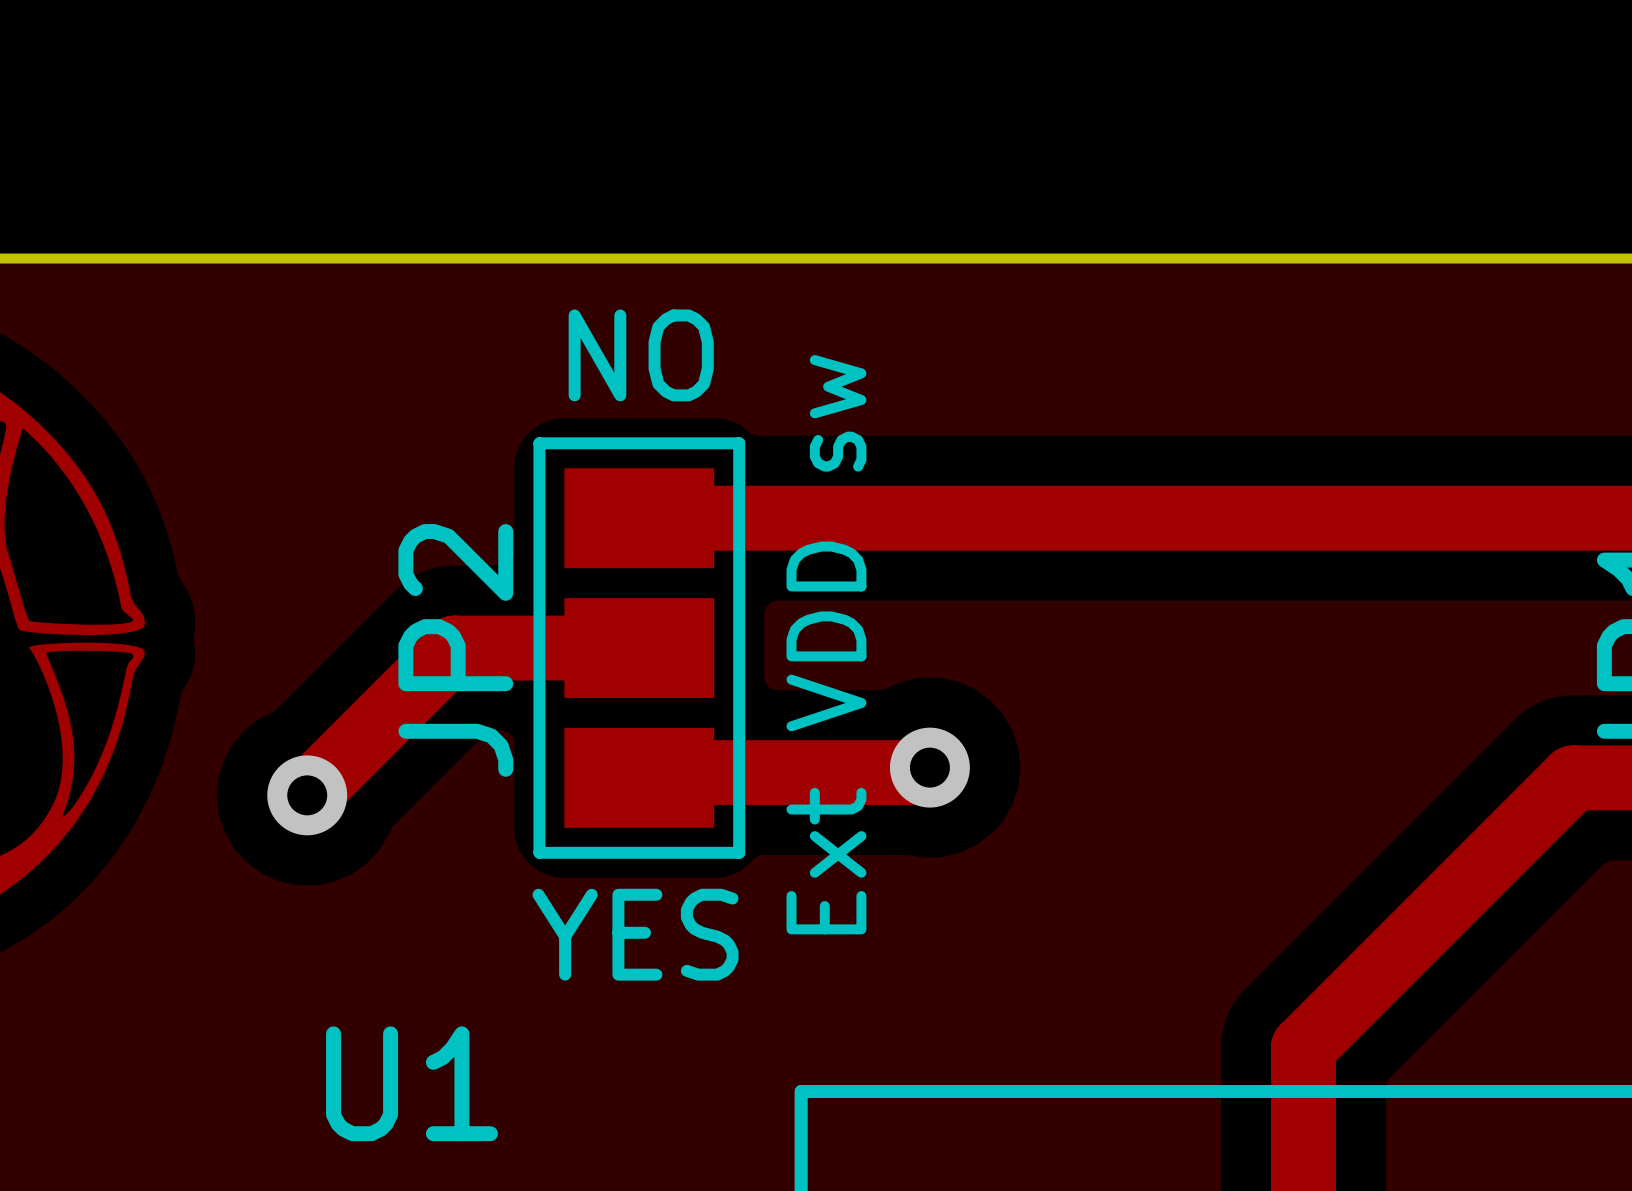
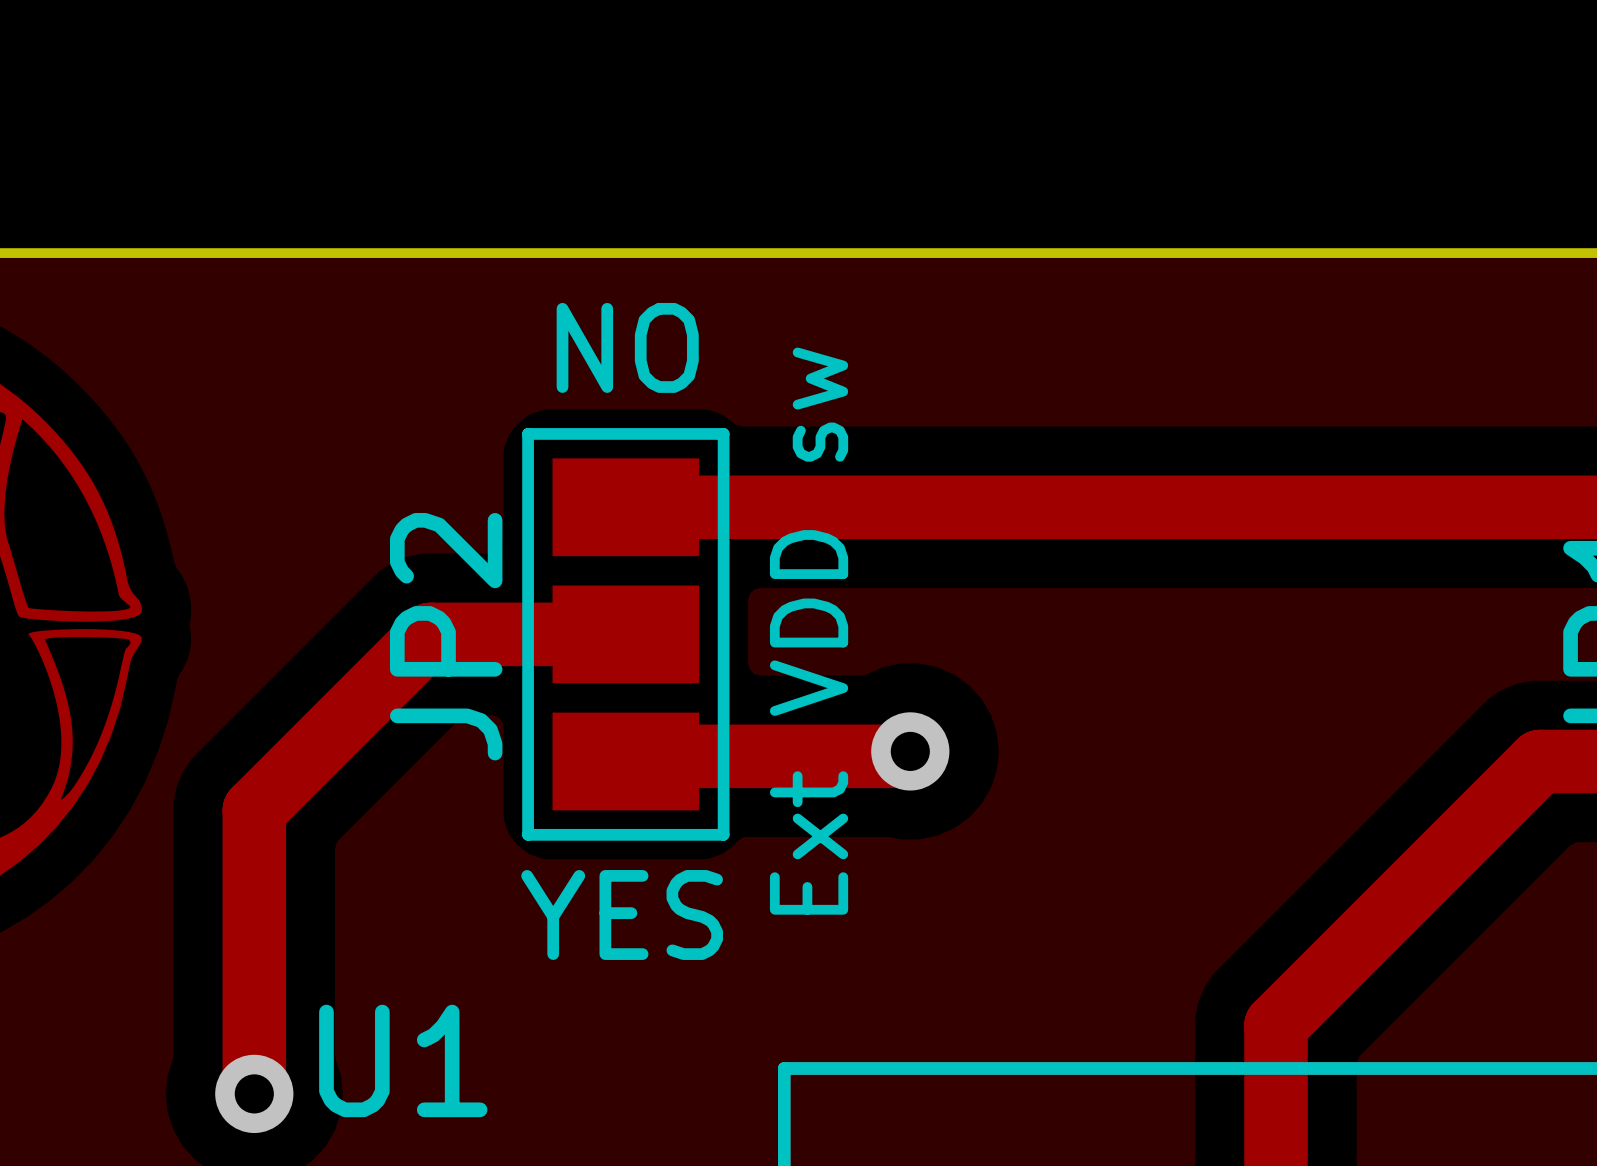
track: (454, 648) (307, 795) -> (444, 634) (430, 634) (254, 810) (254, 1093)
via position: (307, 795) -> (254, 1093)

